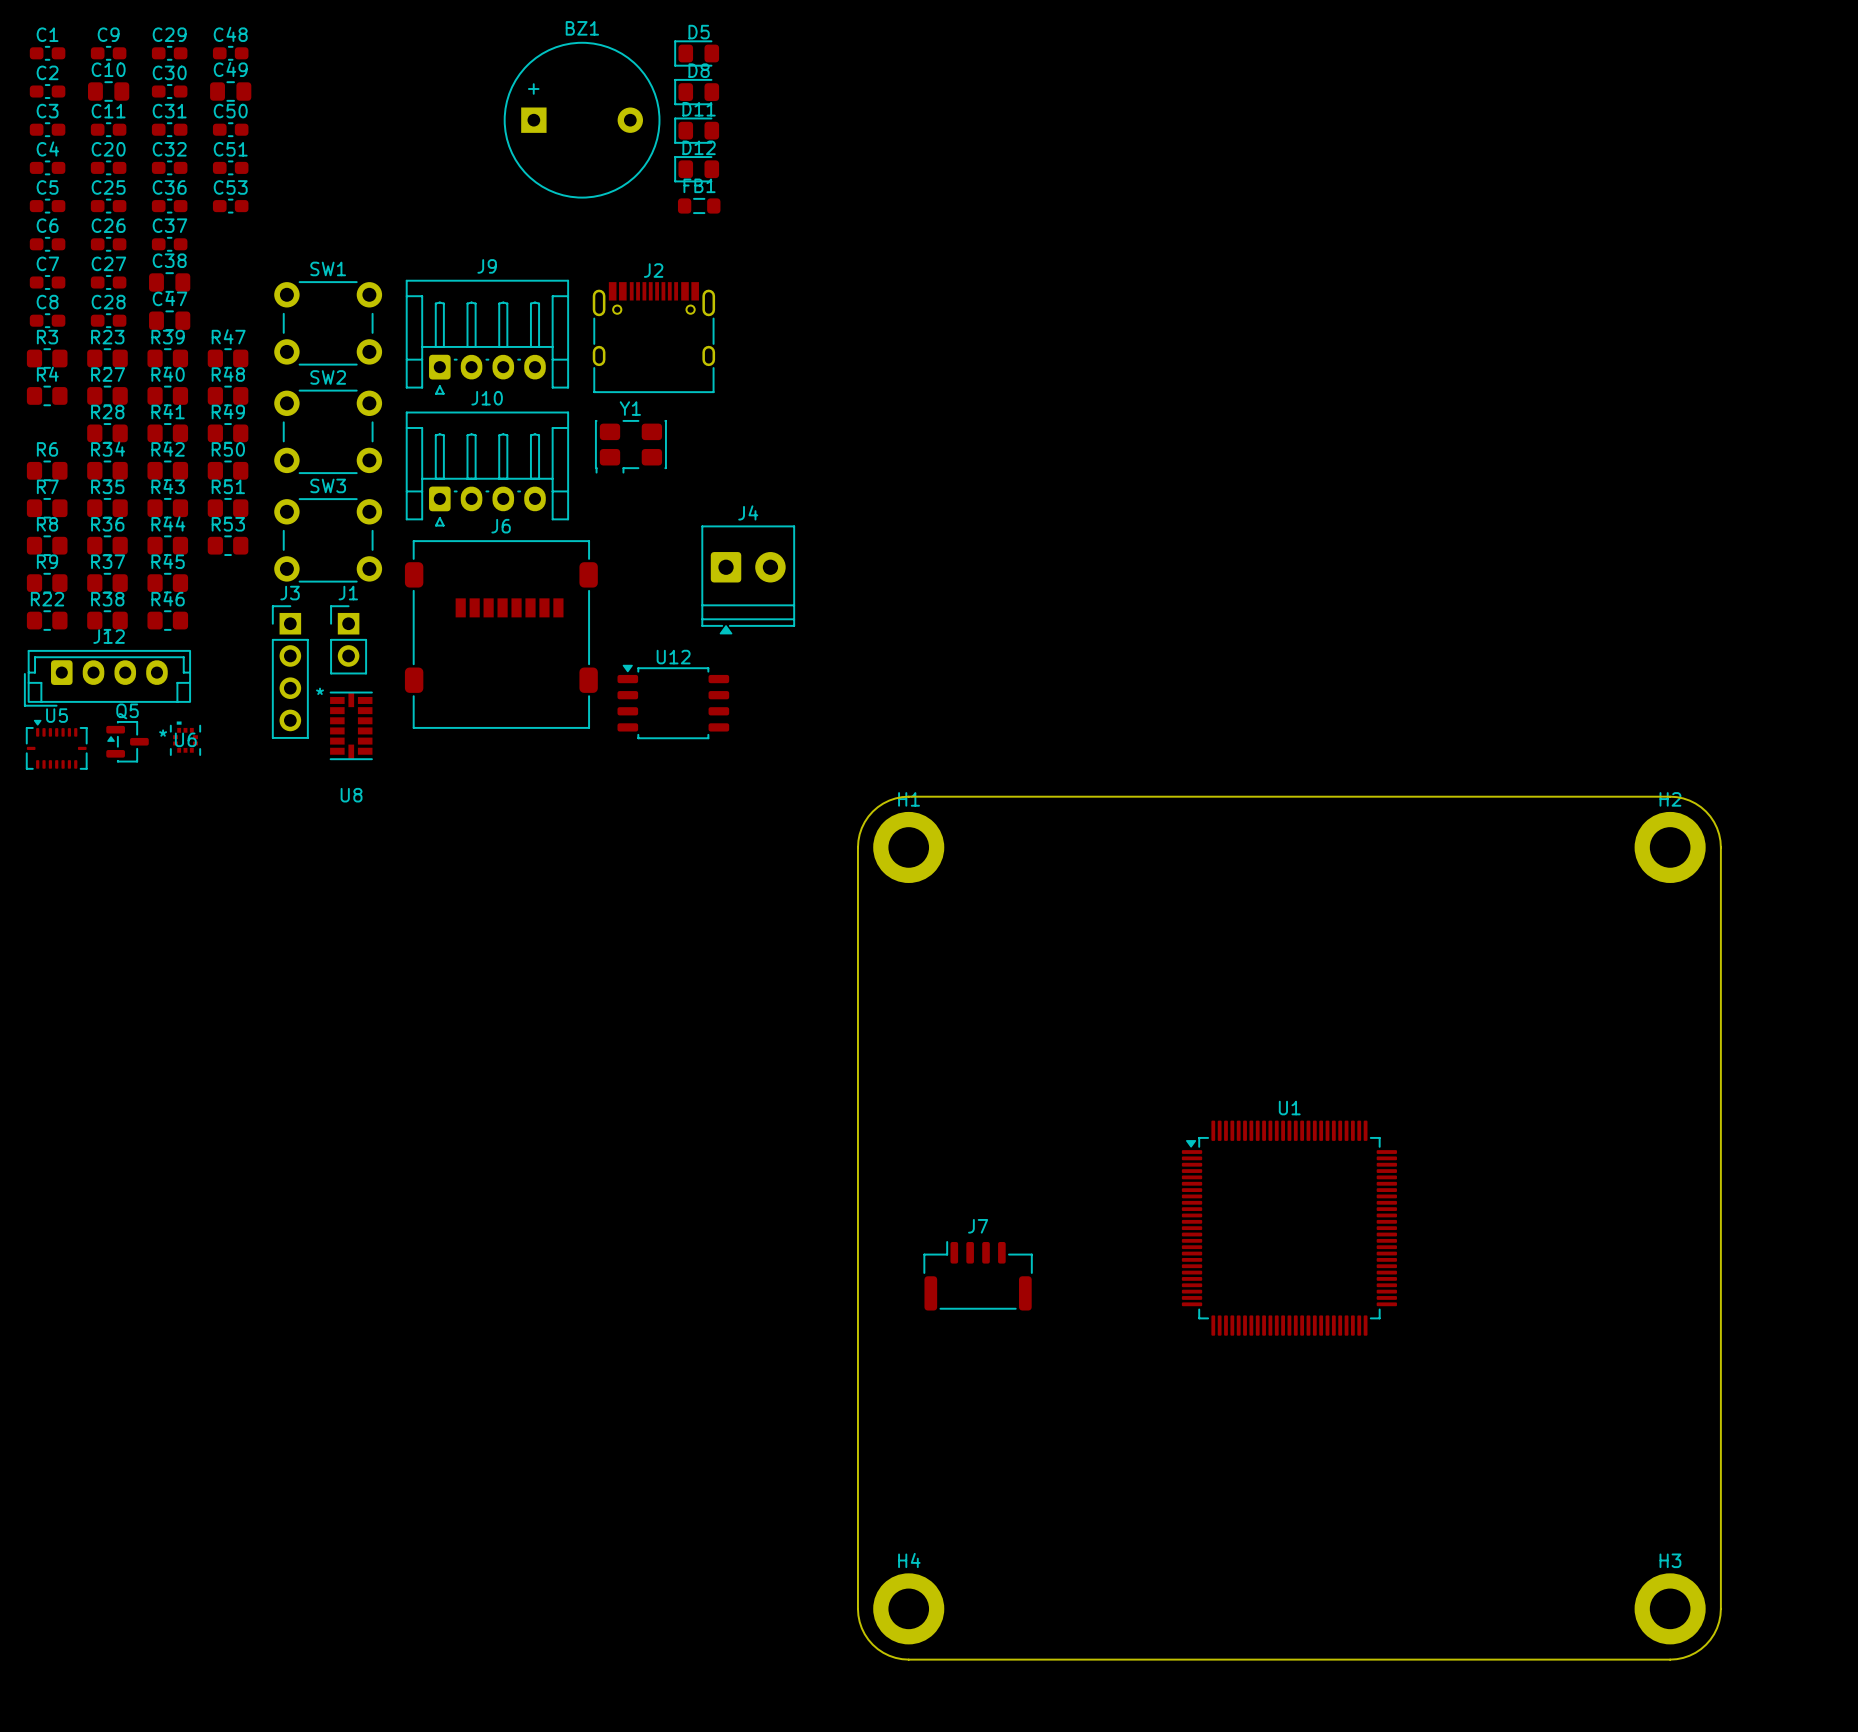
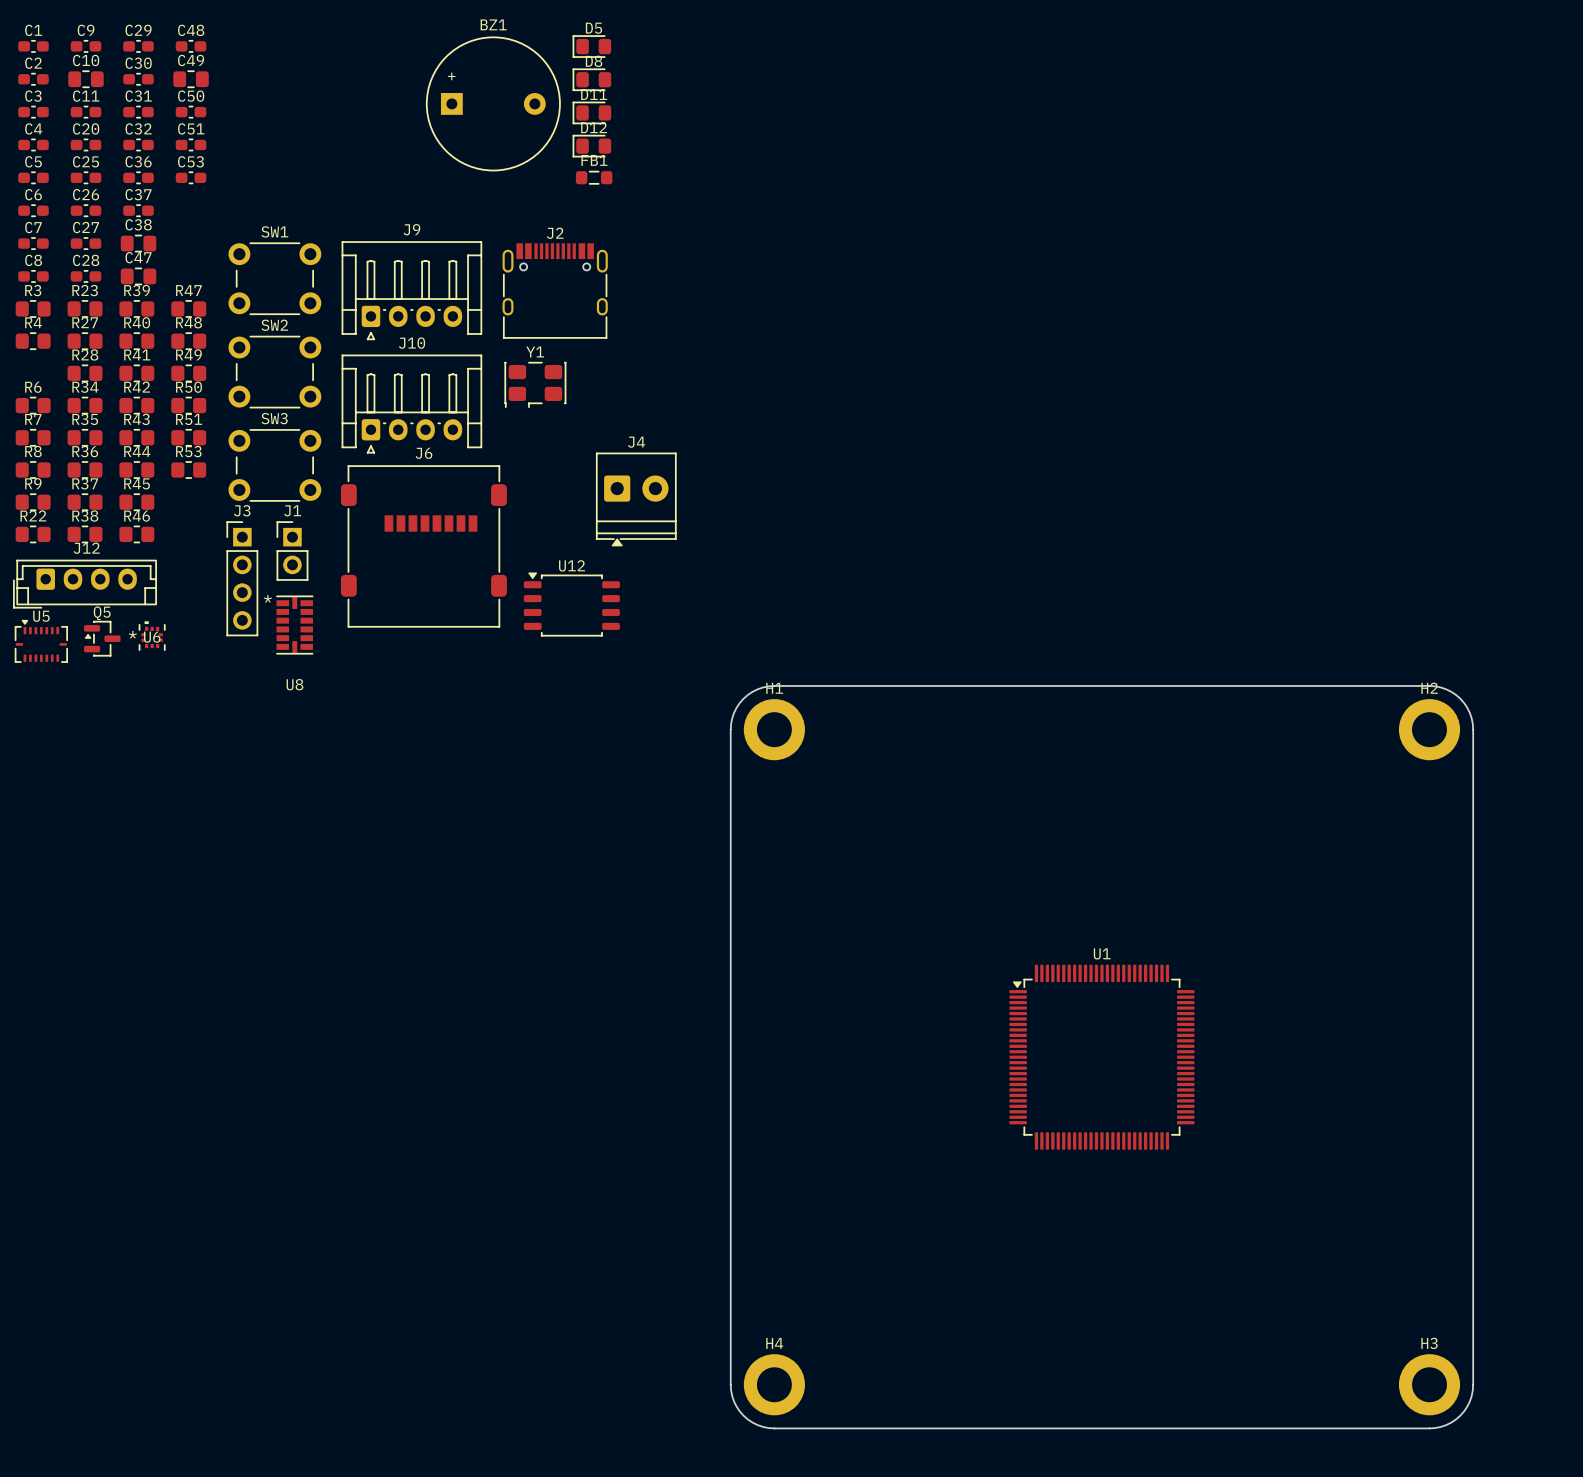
J7: (978, 1275) -> none

